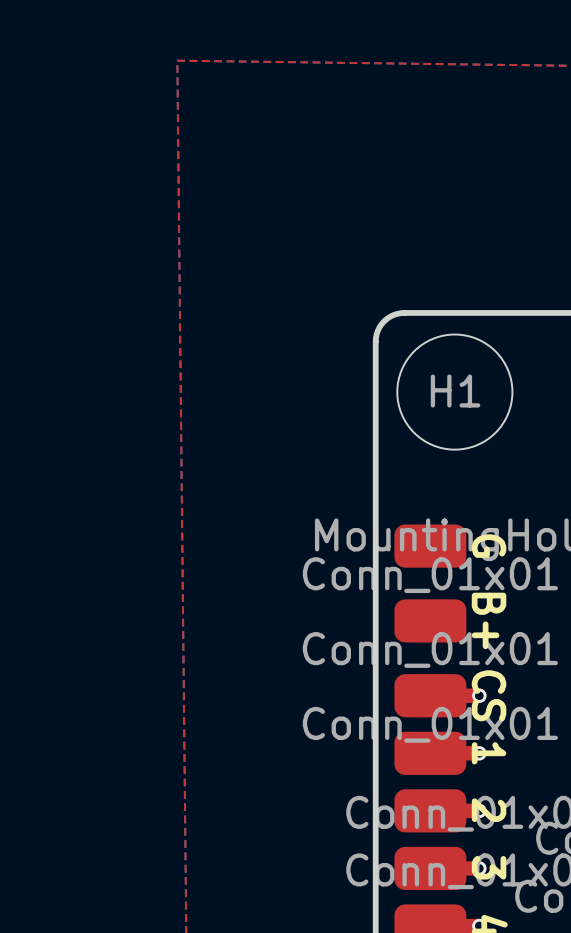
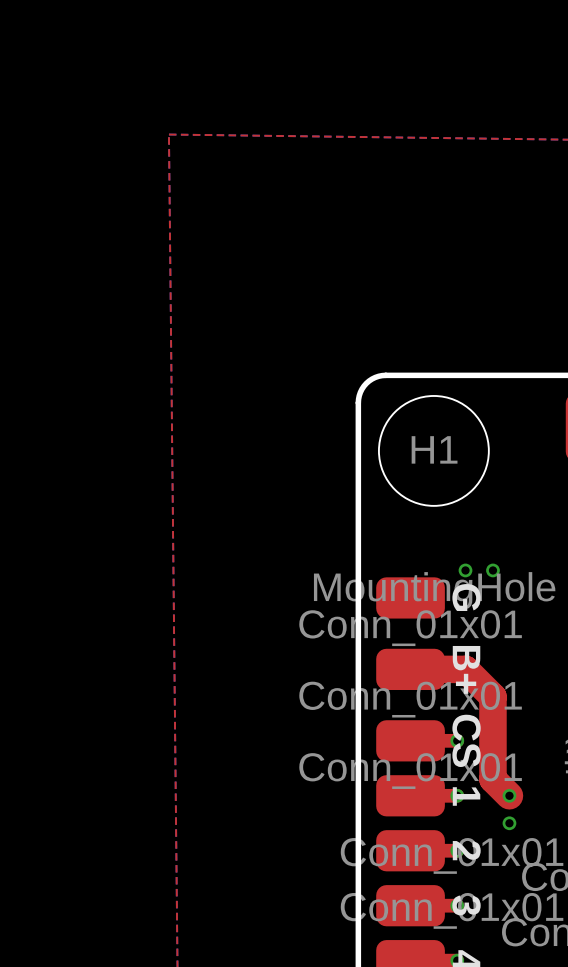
via: none -> (465, 570)
via: none -> (492, 570)
top track: none -> (410, 669) (465, 669) (492, 696) (492, 779) (509, 795)
via: none -> (509, 795)
via: none -> (509, 823)

